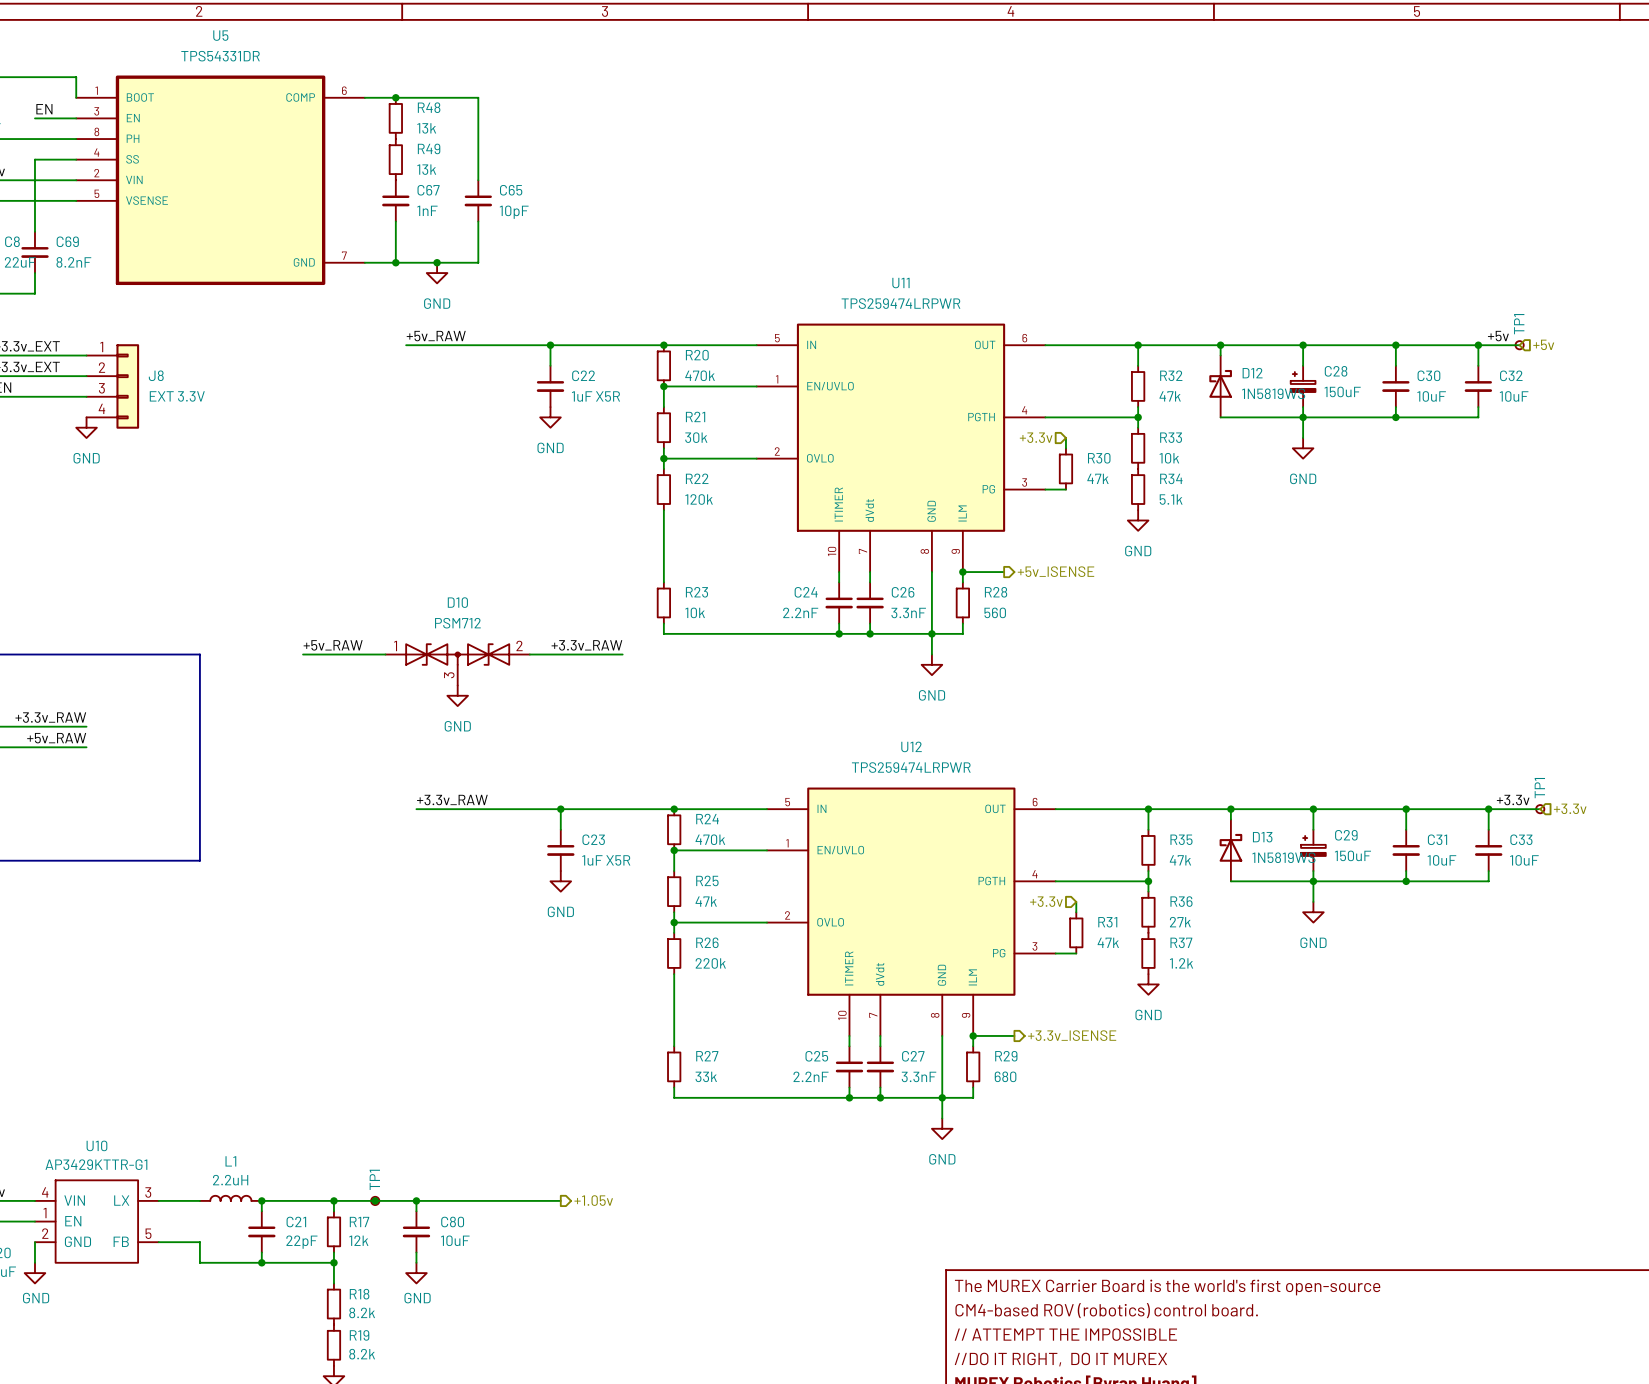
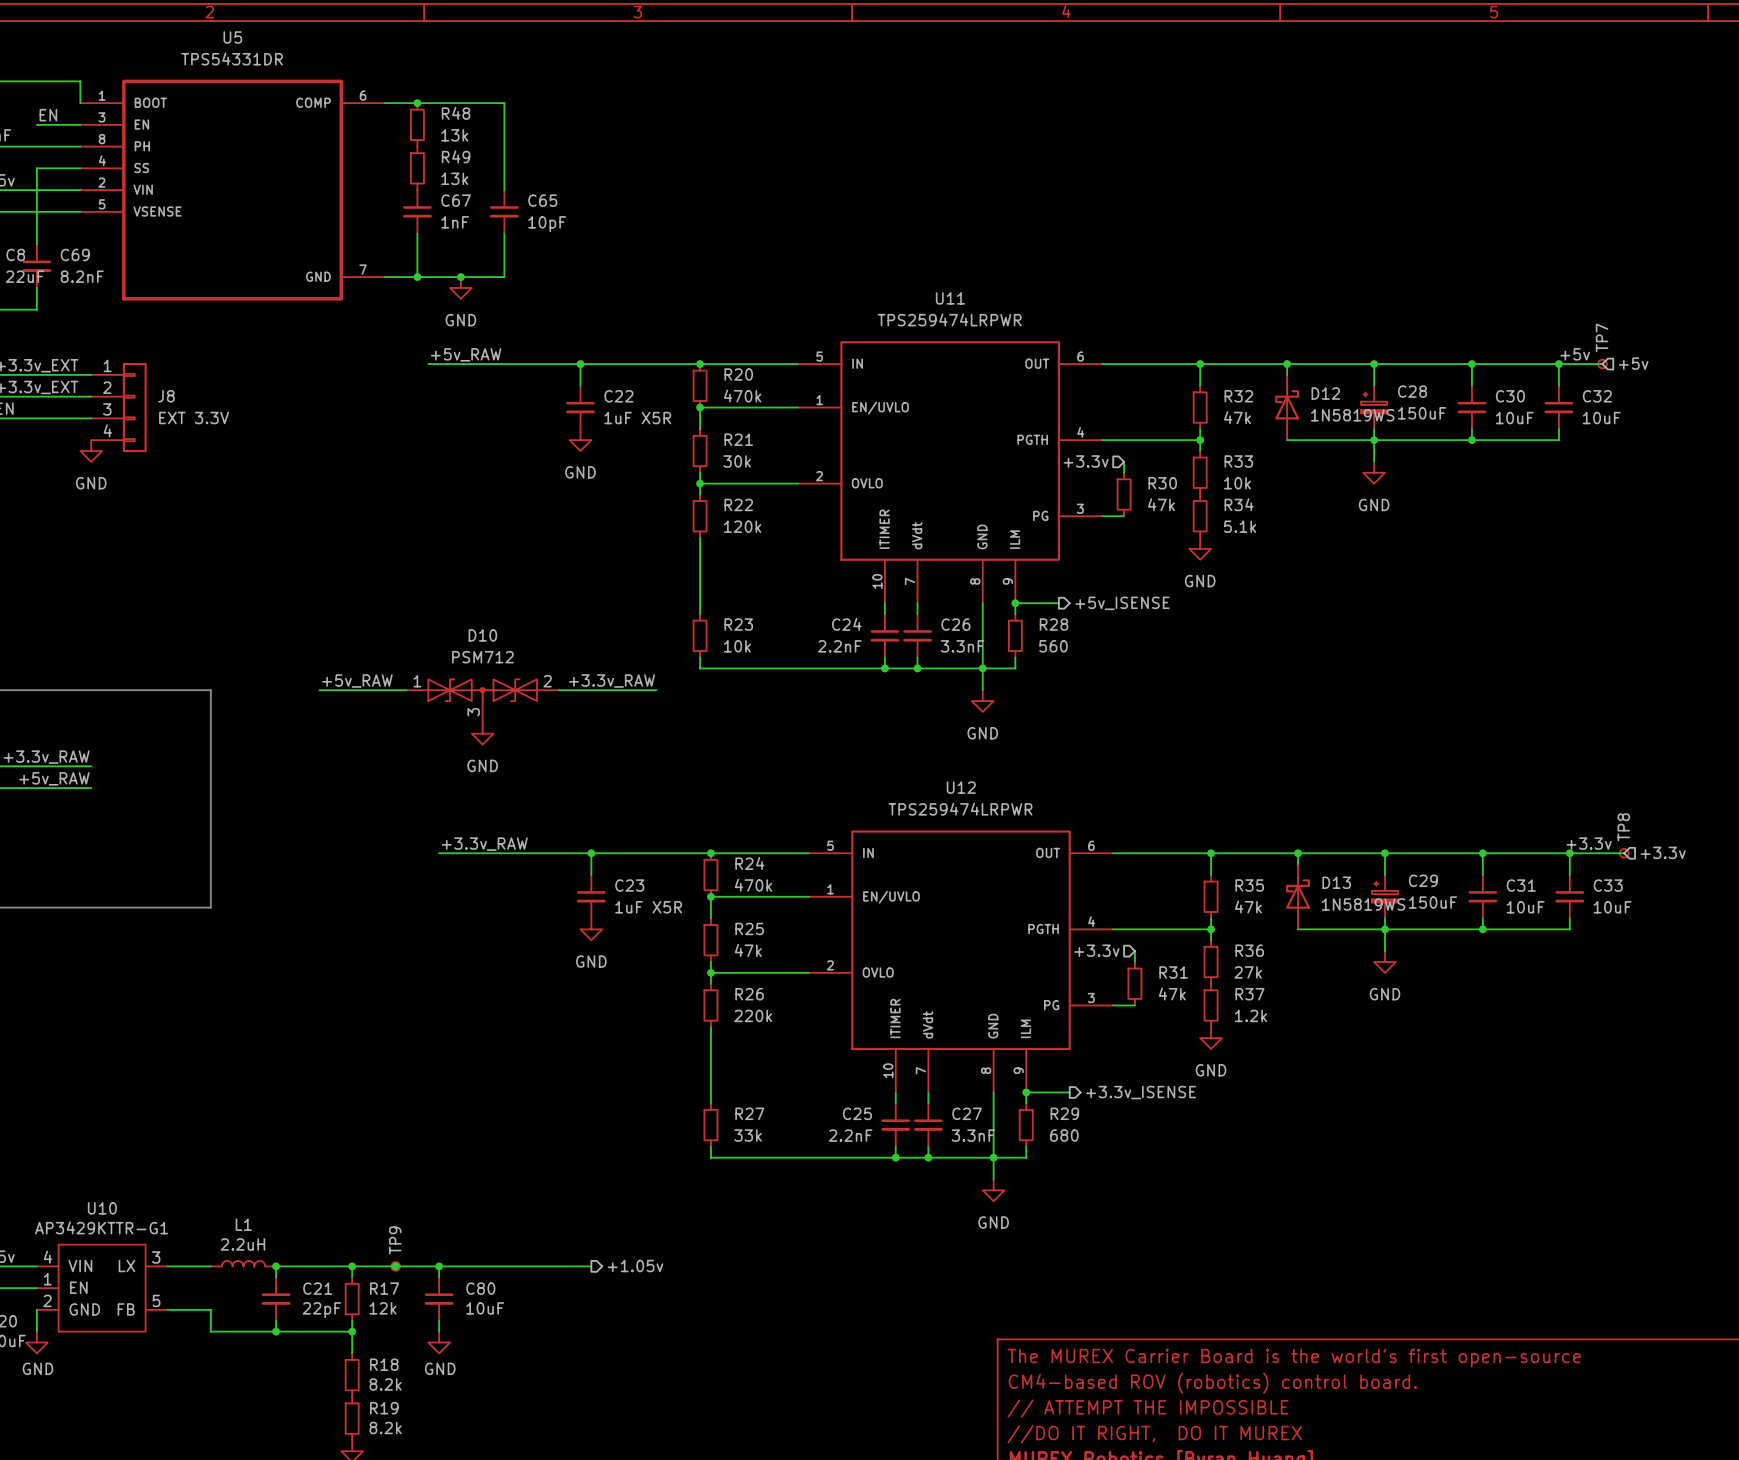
TP1 name: TP1 (1519, 324) -> TP7 (1602, 337)
TP1 name: TP1 (1539, 788) -> TP8 (1623, 827)
TP1 name: TP1 (374, 1179) -> TP9 (395, 1240)

